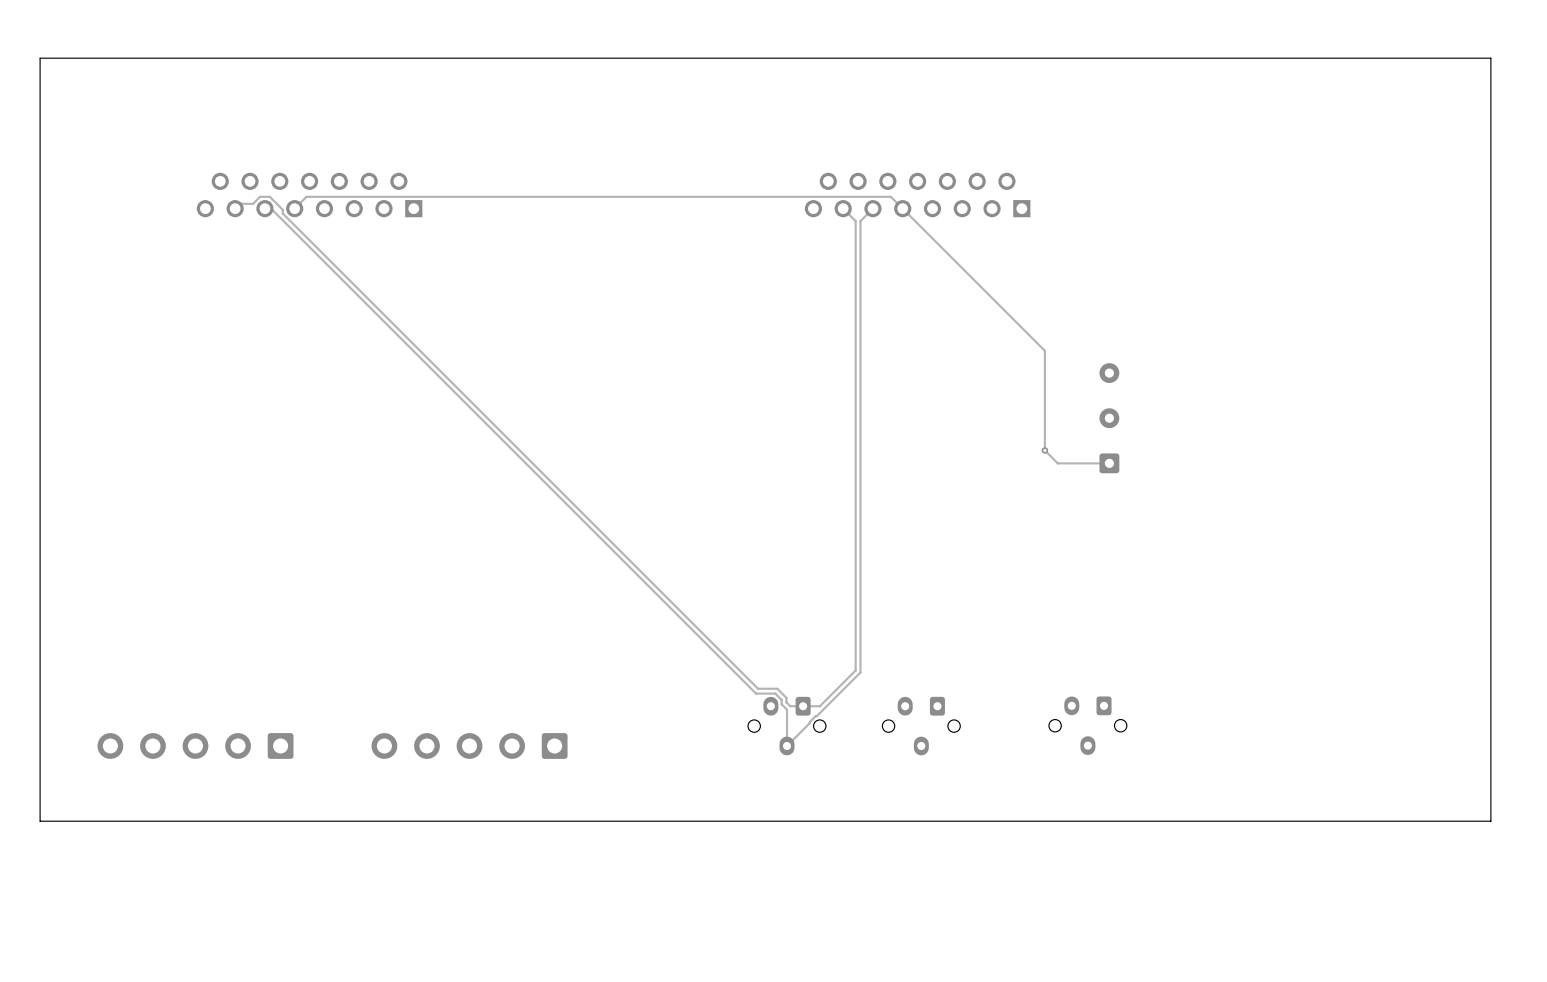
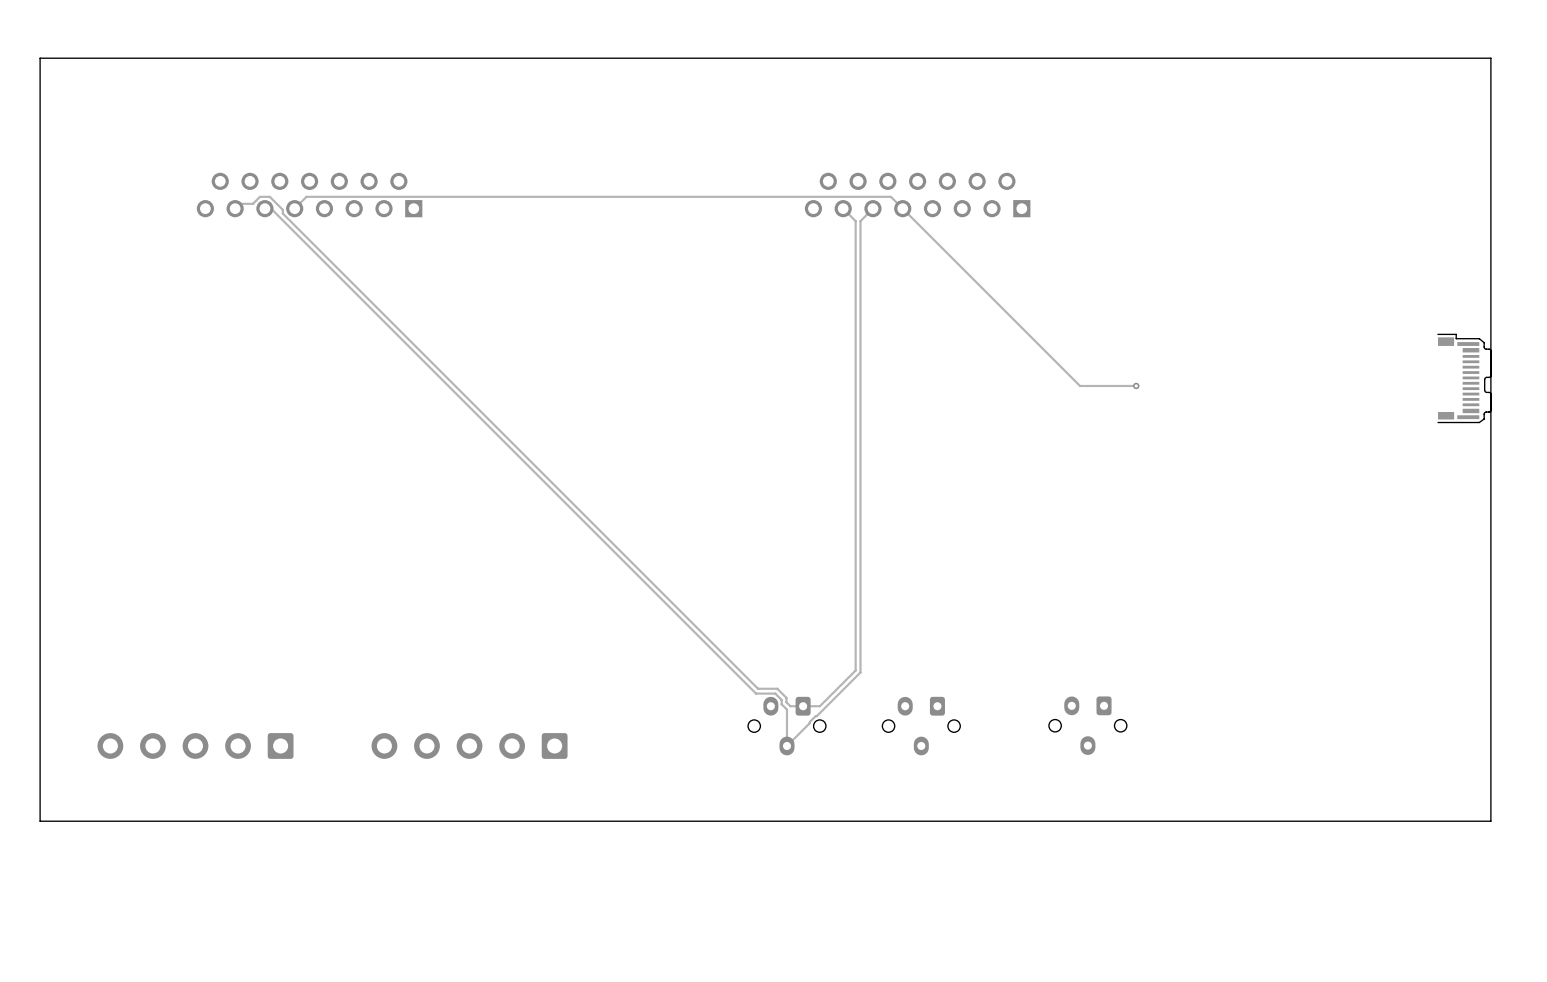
track: (1044, 350) (1044, 450) (1057, 463) (1109, 463) -> (1044, 350) (1080, 385) (1136, 385)
part: none -> (1464, 378)
via: none -> (1136, 385)
part: (1109, 418) -> none
via: (1044, 450) -> none

